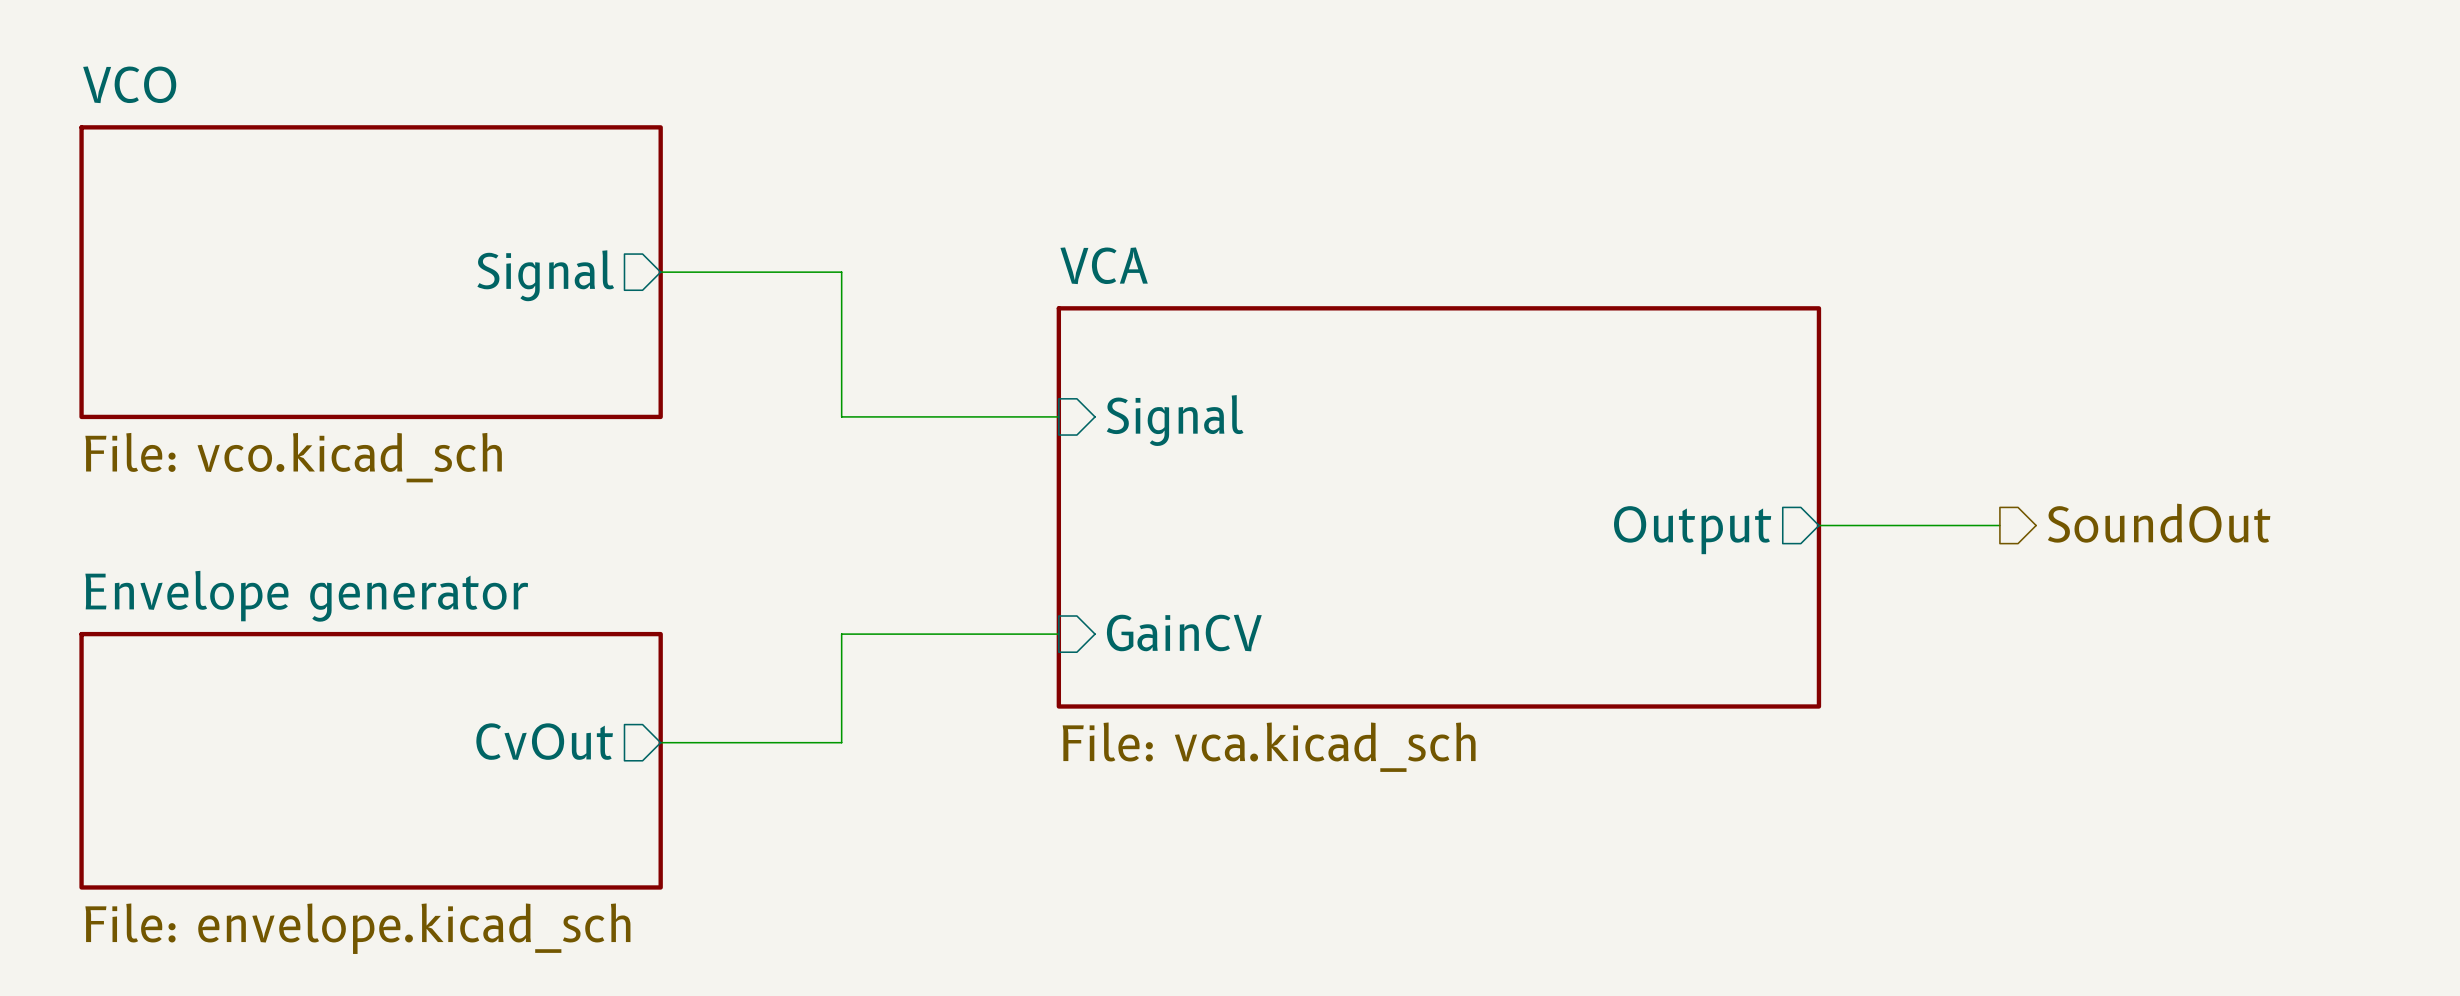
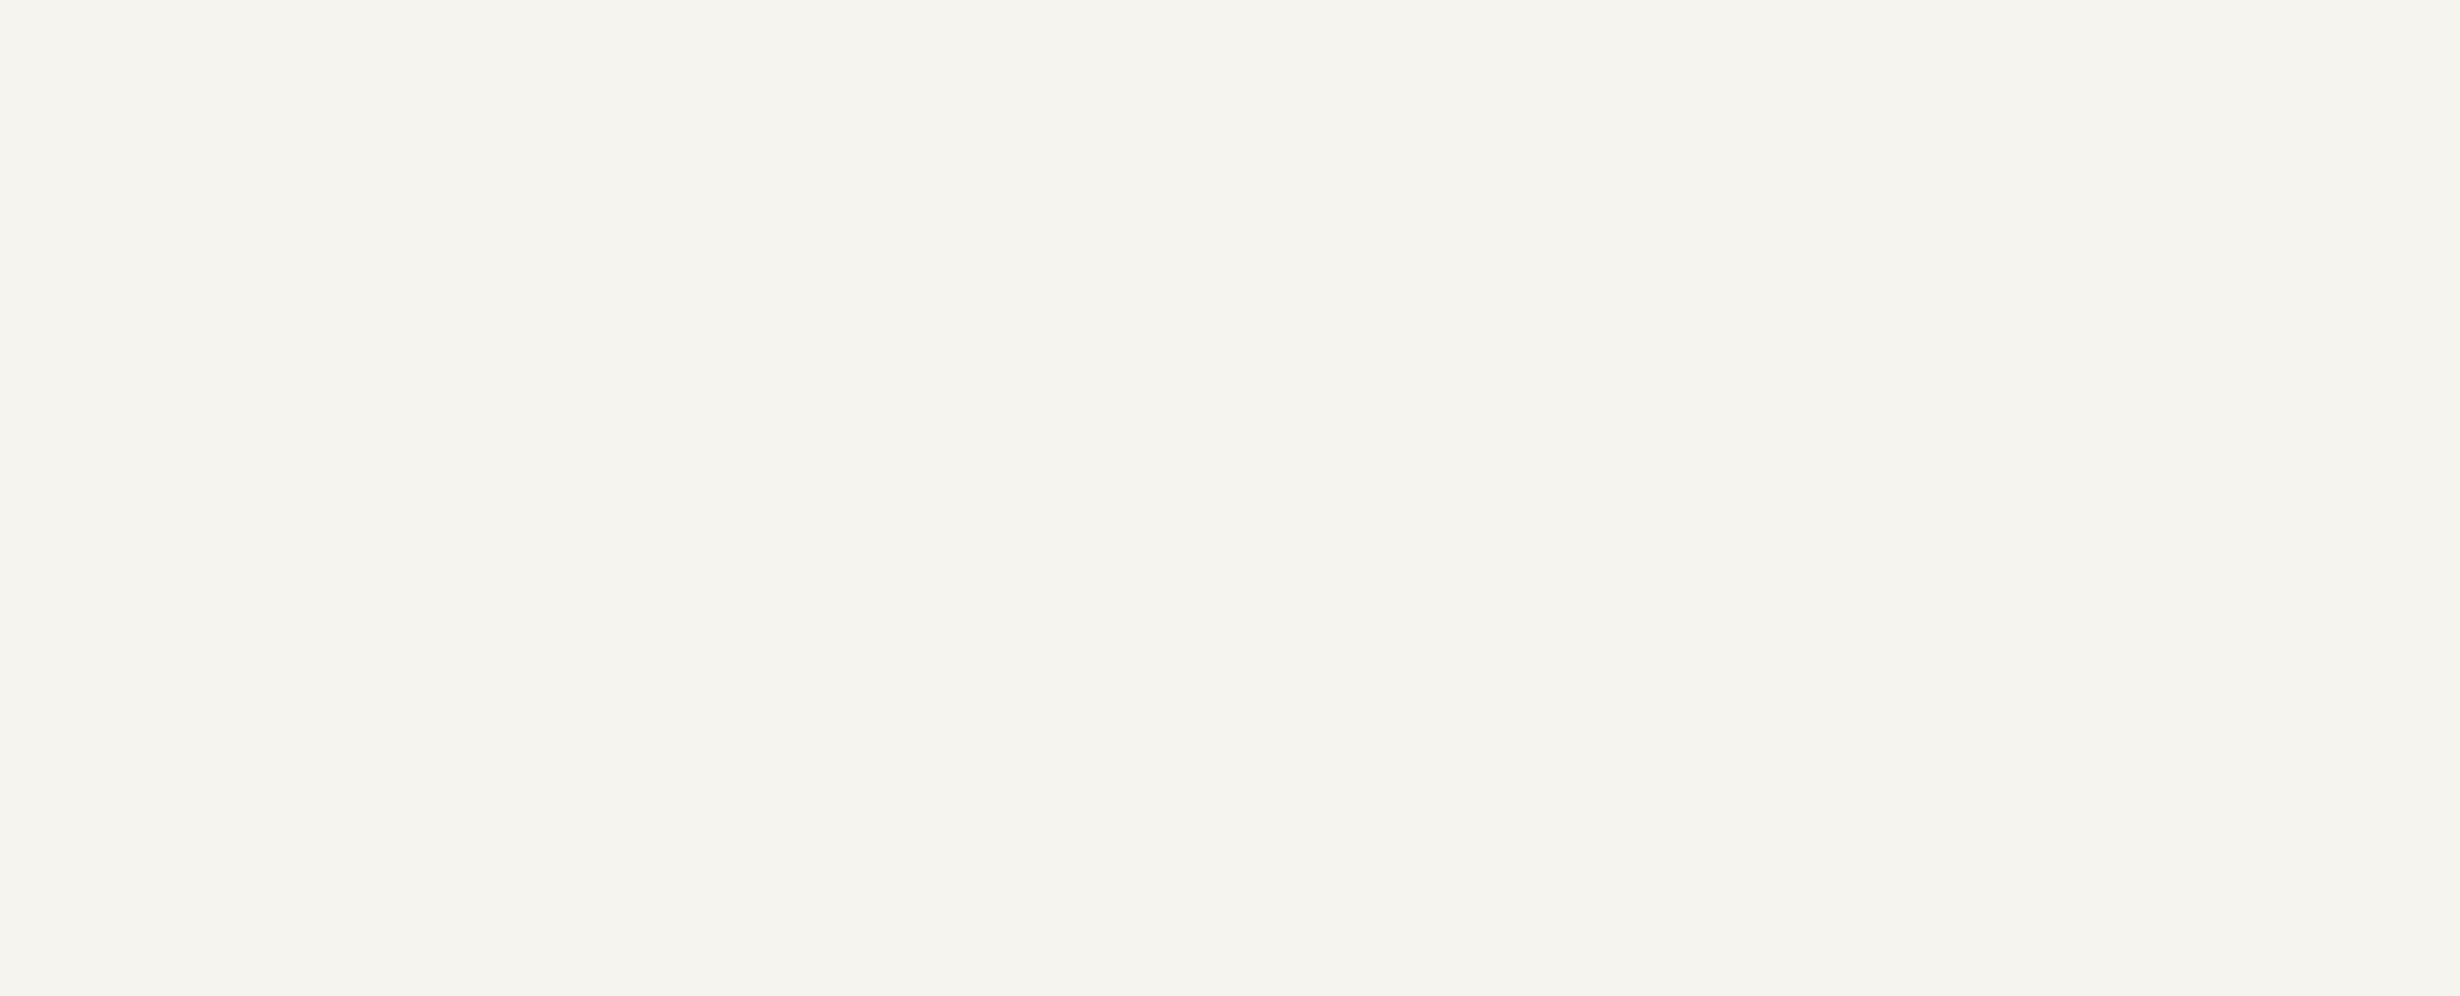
sheet VCO: File: vco.kicad_sch (371, 272) -> none
wire: (660, 272) (841, 272) (841, 416) (1058, 416) -> none
sheet pin: Signal (545, 275) -> none
sheet pin: Signal (1175, 420) -> none
sheet VCA: File: vca.kicad_sch (1438, 507) -> none
hierarchical label: SoundOut (2159, 523) -> none
wire: (1818, 525) (1999, 525) -> none
sheet pin: Output (1692, 530) -> none
sheet pin: GainCV (1184, 632) -> none
wire: (1058, 634) (841, 634) (841, 742) (660, 742) -> none
sheet pin: CvOut (544, 741) -> none
sheet Envelope generator: File: envelope.kicad_sch (371, 760) -> none

